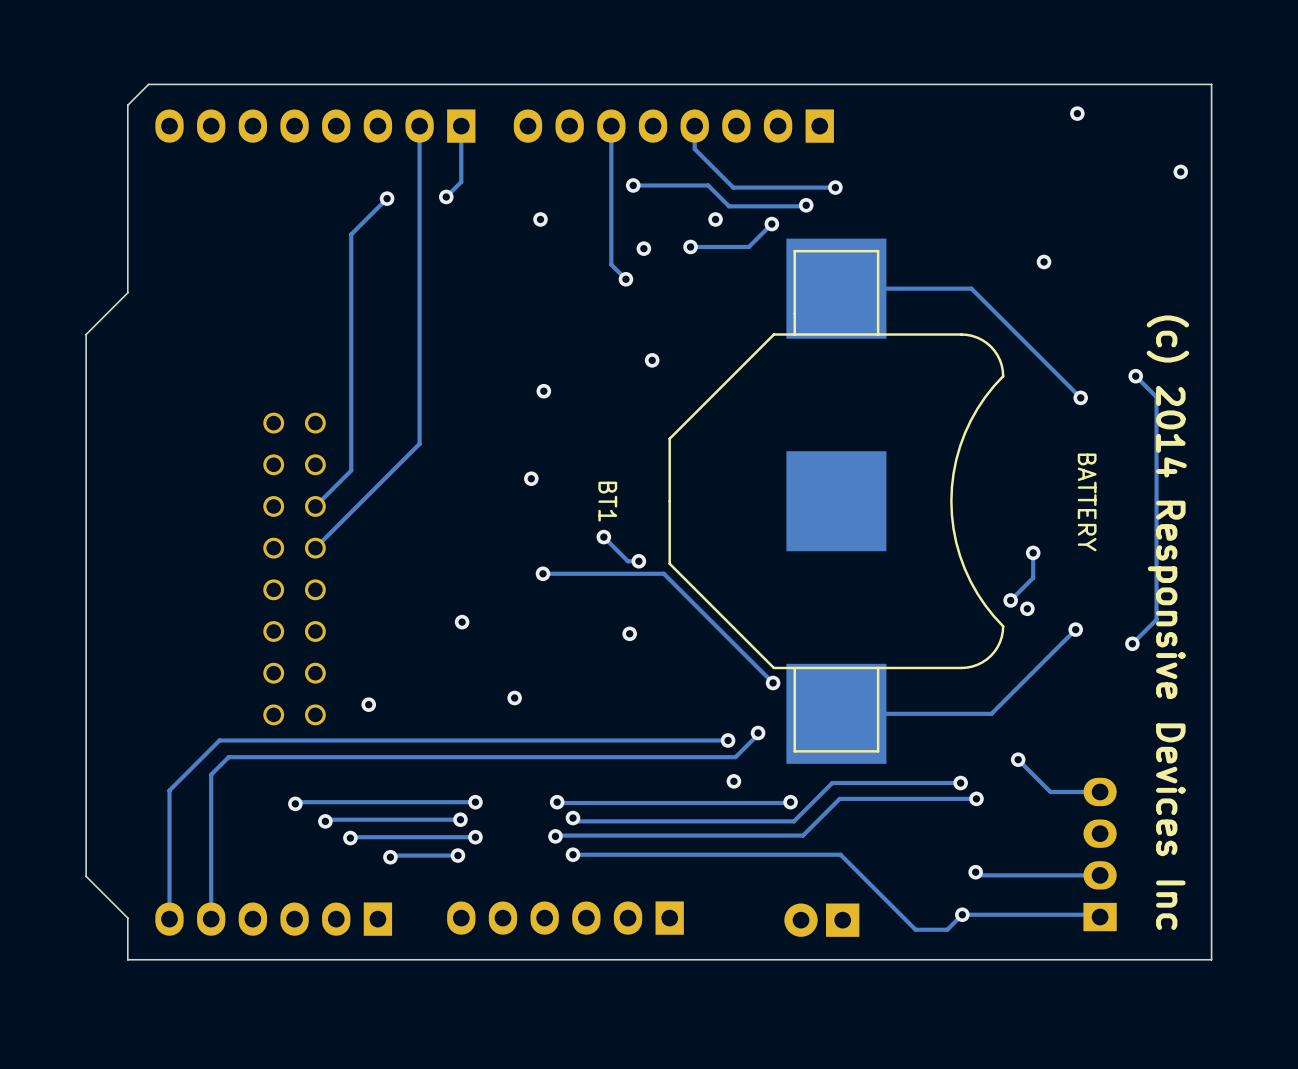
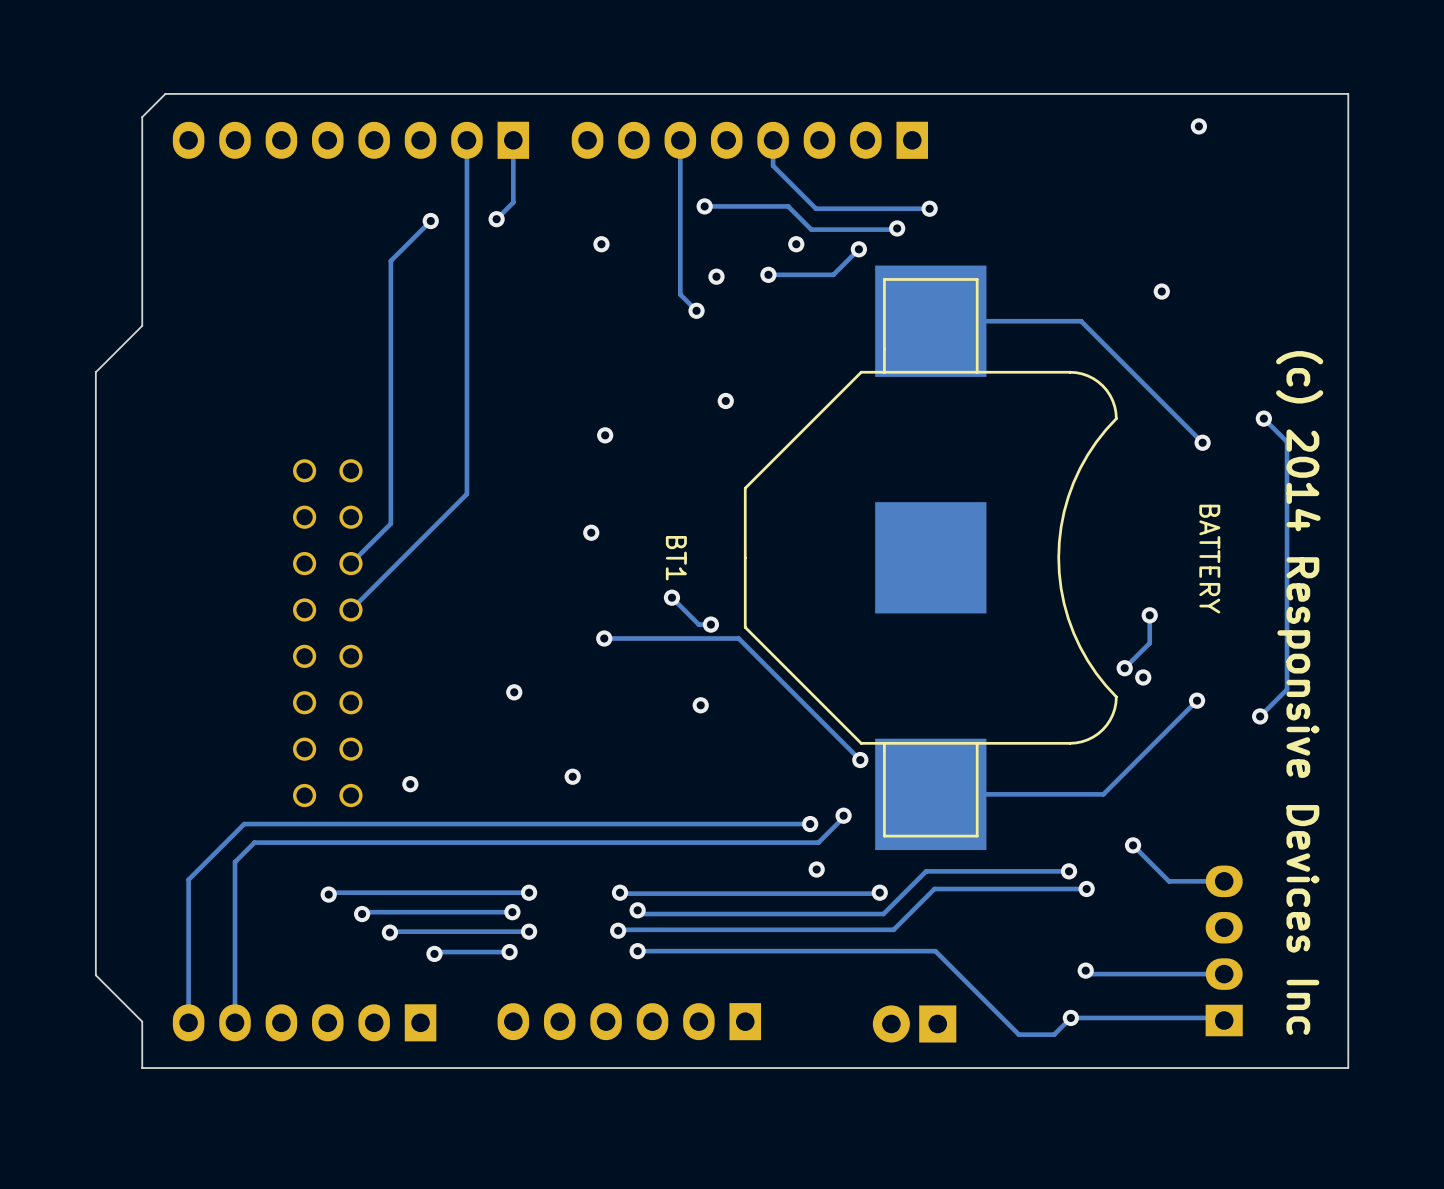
via: (1180, 171) -> none

